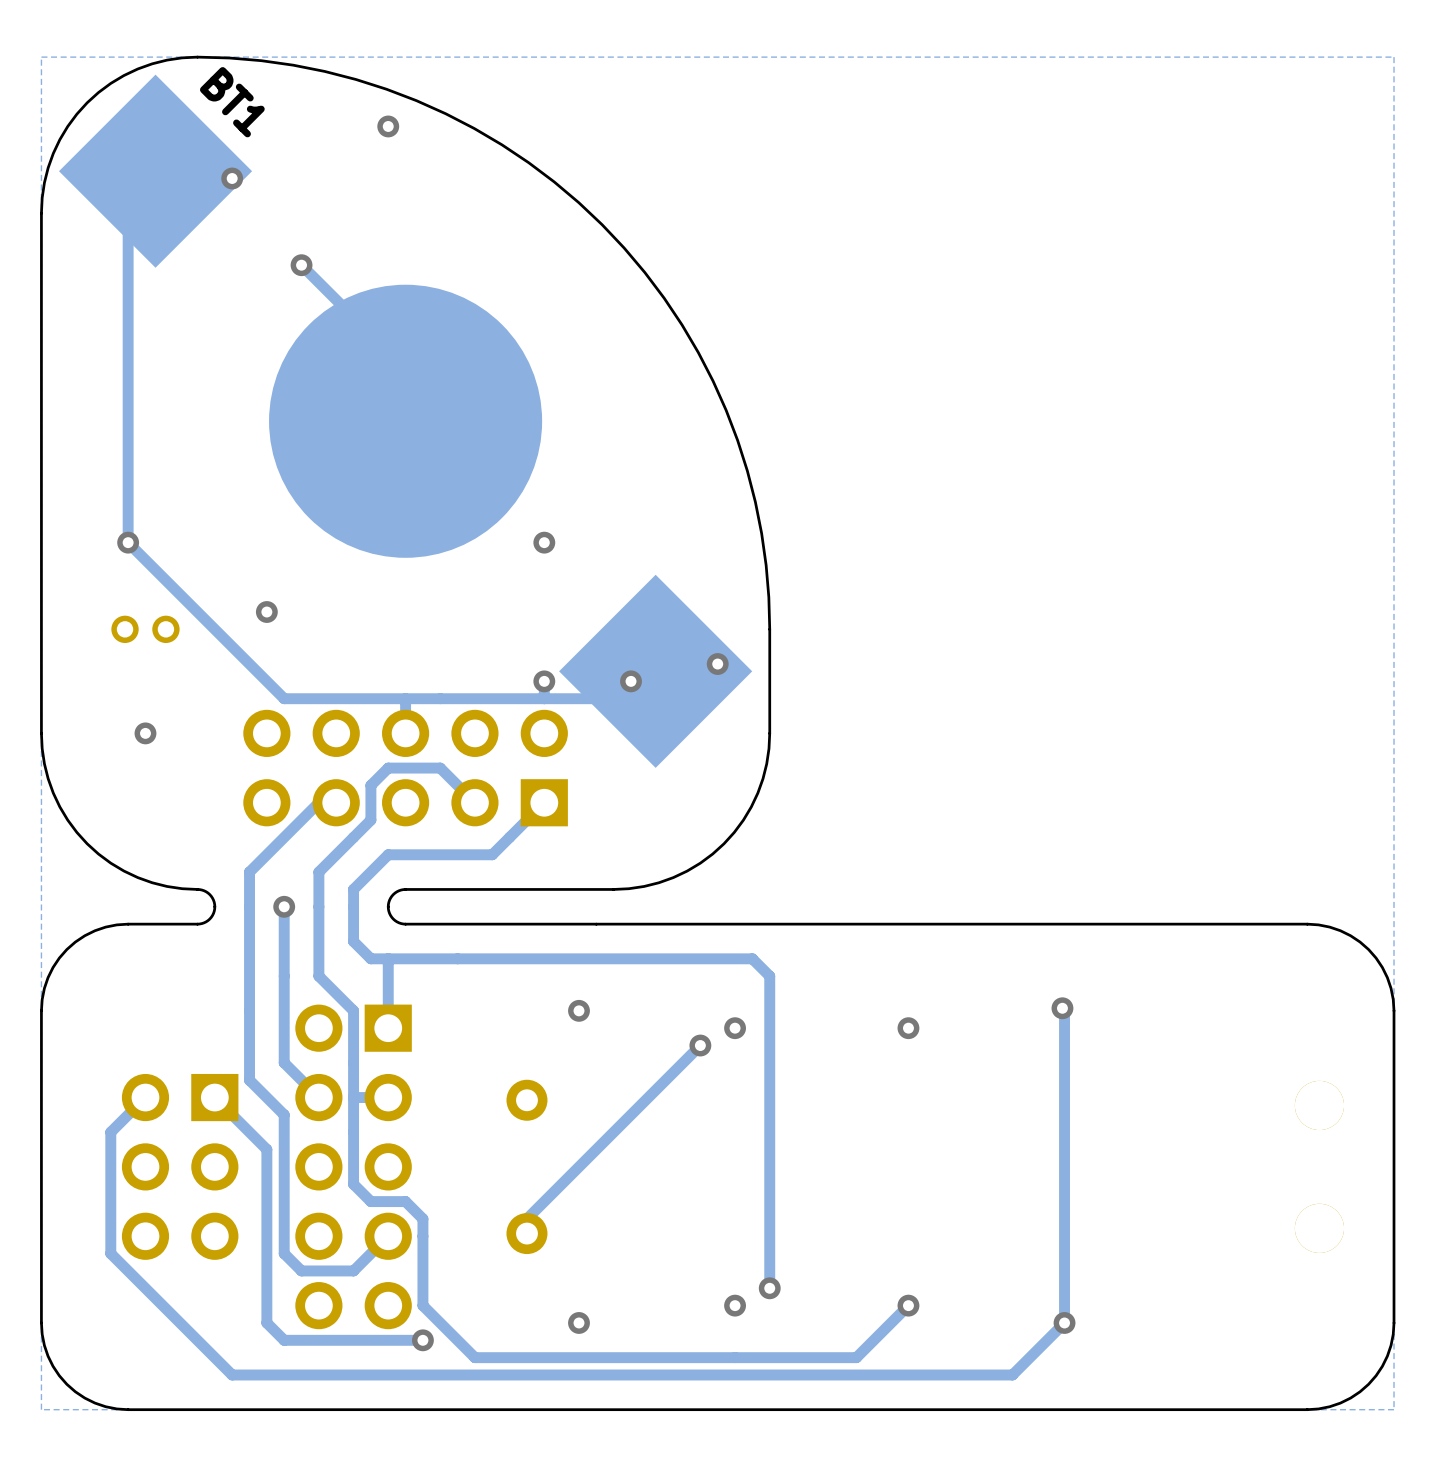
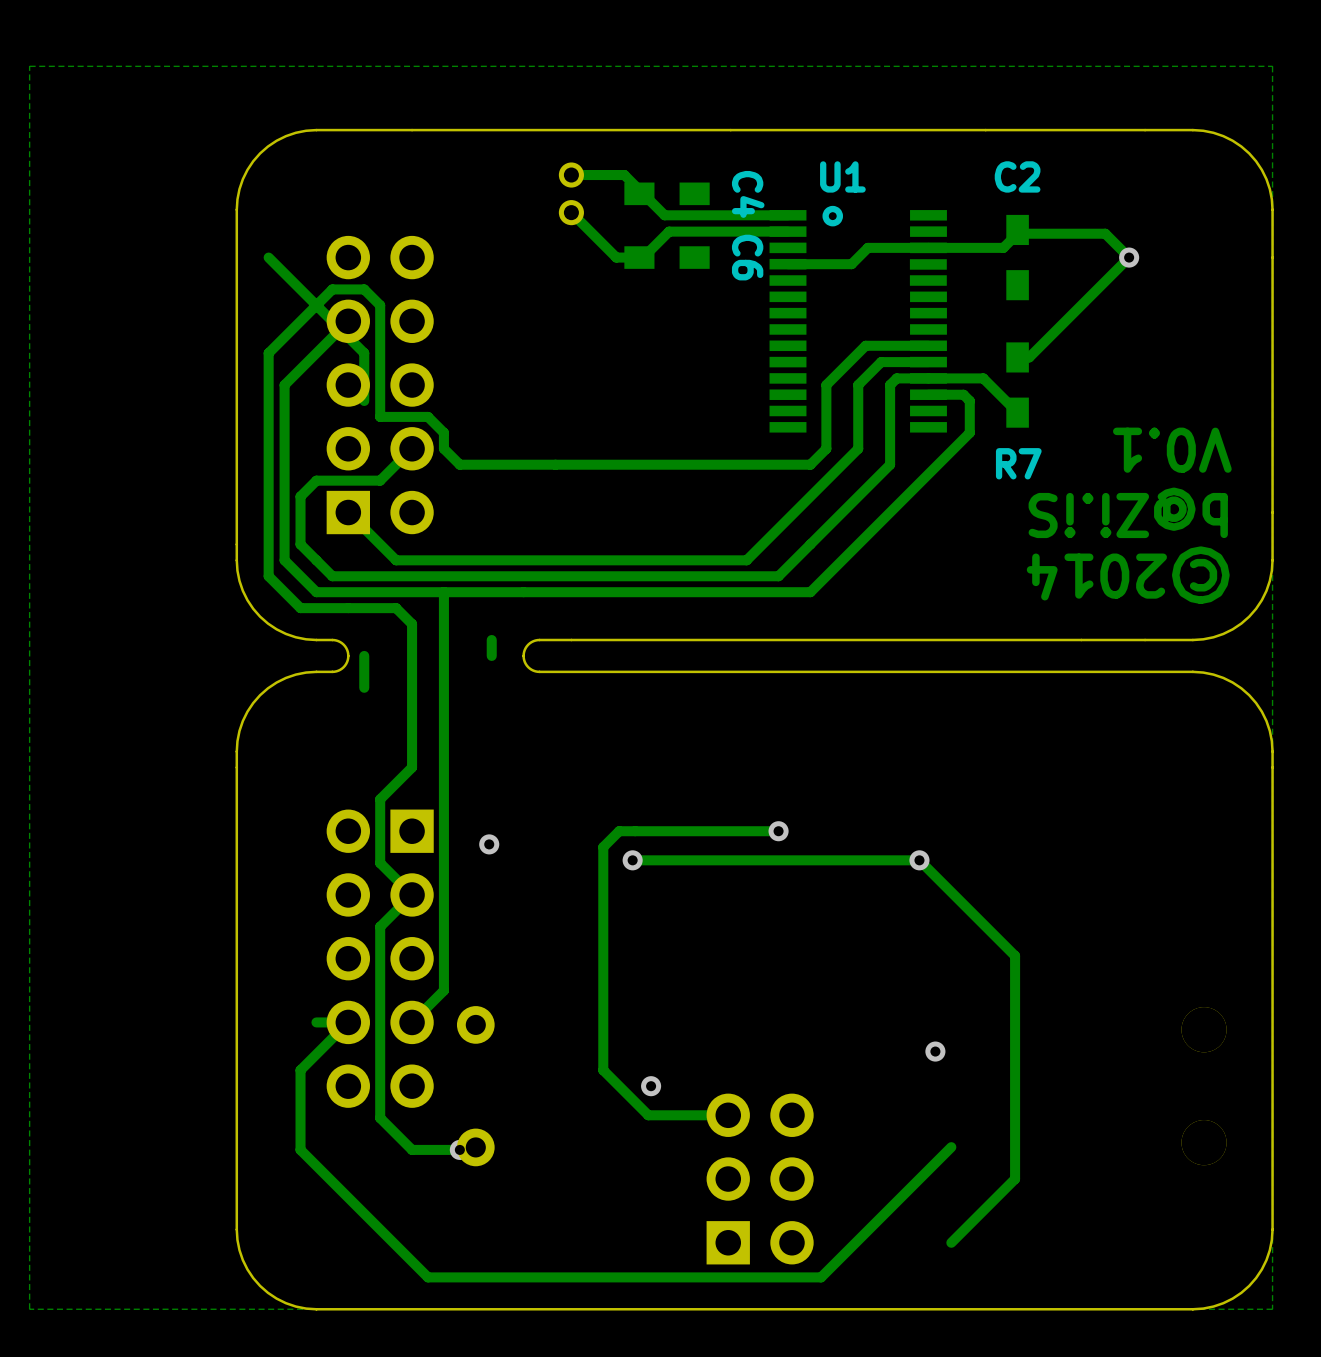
via: (388, 126) -> none
track: (155, 171) (128, 198) (128, 542) (284, 698) (628, 698) (655, 671) (631, 646) (631, 629) -> none
track: none -> (571, 175) (624, 175) (664, 215) (788, 215)
via: (232, 178) -> none
C4: none -> (667, 193)
track: none -> (571, 212) (616, 257) (643, 257) (669, 231) (788, 231)
via: (301, 265) -> none
C6: none -> (667, 257)
C2: none -> (1017, 257)
via: none -> (1129, 257)
track: none -> (788, 264) (851, 264) (867, 247) (1003, 247) (1017, 233) (1105, 233) (1129, 257) (1029, 357) (1017, 357)
U1: none -> (858, 319)
track: none -> (348, 321) (284, 385) (284, 560) (316, 592) (810, 592) (969, 432) (969, 400) (963, 394) (928, 394)
track: none -> (928, 345) (865, 345) (826, 385) (826, 448) (810, 464) (459, 464) (443, 448) (443, 432) (428, 416) (380, 416) (380, 305) (364, 289) (332, 289) (268, 353) (268, 576) (300, 608) (396, 608) (412, 624) (412, 767) (380, 799) (380, 863) (412, 894) (380, 926) (380, 1118) (412, 1149) (459, 1149)
track: none -> (928, 362) (881, 362) (858, 385) (858, 448) (746, 560) (396, 560) (348, 512)
part: none -> (380, 385)
R7: none -> (1017, 385)
BT1: (405, 421) -> none
track: none -> (1017, 412) (983, 378) (896, 378) (890, 385) (890, 464) (778, 576) (332, 576) (300, 544) (300, 496) (316, 480) (380, 480) (412, 448)
text: none -> V0.1 (1172, 450)
via: (128, 542) -> none
via: (544, 542) -> none
text: none -> b@Zi.iS (1128, 512)
text: none -> ©2014 (1128, 575)
via: (266, 612) -> none
part rotation: 0° (145, 629) -> 90° clockwise (571, 193)
part position: (145, 629) -> (571, 193)
track: none -> (443, 592) (443, 990) (412, 1022)
via: (717, 664) -> none
via: (544, 681) -> none
via: (631, 681) -> none
via: (145, 733) -> none
part: (405, 768) -> none
track: (336, 802) (318, 802) (249, 872) (249, 1080) (284, 1114) (284, 1253) (301, 1270) (353, 1270) (388, 1236) -> none
track: (474, 802) (440, 768) (388, 768) (370, 785) (370, 820) (318, 872) (318, 976) (353, 1010) (353, 1184) (370, 1201) (405, 1201) (422, 1218) (422, 1305) (474, 1357) (856, 1357) (908, 1305) -> none
track: (544, 802) (492, 854) (388, 854) (353, 889) (353, 941) (370, 958) (752, 958) (769, 976) (769, 1288) -> none
track: none -> (778, 831) (619, 831) (603, 847) (603, 1070) (648, 1115) (728, 1115)
via: none -> (778, 831)
via: none -> (489, 844)
track: (284, 906) (284, 1062) (318, 1097) -> none
via: (284, 906) -> none
track: none -> (632, 860) (919, 860) (1015, 955) (1015, 1179) (951, 1242)
via: none -> (632, 860)
via: none -> (919, 860)
track: (388, 958) (388, 1028) -> none
track: (1062, 1008) (1064, 1010) (1064, 1322) (1012, 1374) (902, 1374) -> (951, 1147) (821, 1277)
via: (1062, 1008) -> none
via: (578, 1010) -> none
board edge: (1394, 1010) (1387, 977) (1376, 958) (1350, 935) (1318, 924) (405, 924) (395, 920) (388, 911) (388, 902) (395, 893) (403, 889) (613, 889) (644, 886) (658, 882) (673, 877) (700, 863) (724, 843) (734, 832) (751, 806) (763, 778) (768, 748) (769, 733) (769, 629) (766, 565) (755, 502) (747, 470) (737, 440) (713, 381) (682, 324) (664, 298) (644, 272) (602, 224) (554, 181) (501, 144) (474, 128) (416, 100) (386, 89) (324, 71) (261, 60) (197, 57) (167, 60) (137, 68) (110, 83) (98, 92) (76, 114) (59, 139) (53, 153) (48, 167) (42, 197) (42, 748) (48, 778) (59, 806) (76, 832) (87, 843) (110, 863) (137, 877) (167, 886) (206, 891) (213, 900) (214, 909) (209, 919) (199, 923) (128, 924) (94, 930) (66, 949) (48, 977) (41, 1010) (42, 1334) (48, 1356) (59, 1375) (84, 1398) (105, 1406) (128, 1409) (353, 1409) -> (1272, 942) (1271, 741) (1266, 721) (1256, 703) (1241, 688) (1223, 677) (1192, 671) (539, 671) (528, 667) (523, 655) (528, 644) (539, 640) (1192, 640) (1223, 633) (1241, 623) (1261, 600) (1269, 580) (1272, 560) (1271, 199) (1261, 169) (1241, 146) (1213, 132) (1192, 130) (316, 130) (285, 136) (267, 146) (253, 161) (242, 179) (237, 199) (237, 570) (247, 600) (267, 623) (295, 637) (338, 641) (346, 647) (348, 655) (345, 665) (338, 670) (295, 674) (267, 688) (247, 711) (237, 741) (236, 1229) (242, 1260) (260, 1285) (285, 1303) (316, 1309)
part: none -> (380, 958)
via: (735, 1028) -> none
via: (908, 1028) -> none
track: (700, 1045) (526, 1218) (526, 1233) -> none
via: (700, 1045) -> none
track: (145, 1097) (110, 1132) (110, 1253) (232, 1374) (474, 1374) -> (348, 1022) (300, 1070) (300, 1149) (428, 1277)
track: (214, 1097) (266, 1149) (266, 1322) (284, 1340) (422, 1340) -> none
via: none -> (935, 1051)
part rotation: 0° (180, 1166) -> 180° (760, 1179)
part position: (180, 1166) -> (760, 1179)
part: (353, 1166) -> none
via: none -> (651, 1086)
via: none -> (459, 1149)
via: (769, 1288) -> none
via: (735, 1305) -> none
via: (908, 1305) -> none
via: (578, 1322) -> none
via: (1064, 1322) -> none
via: (422, 1340) -> none

